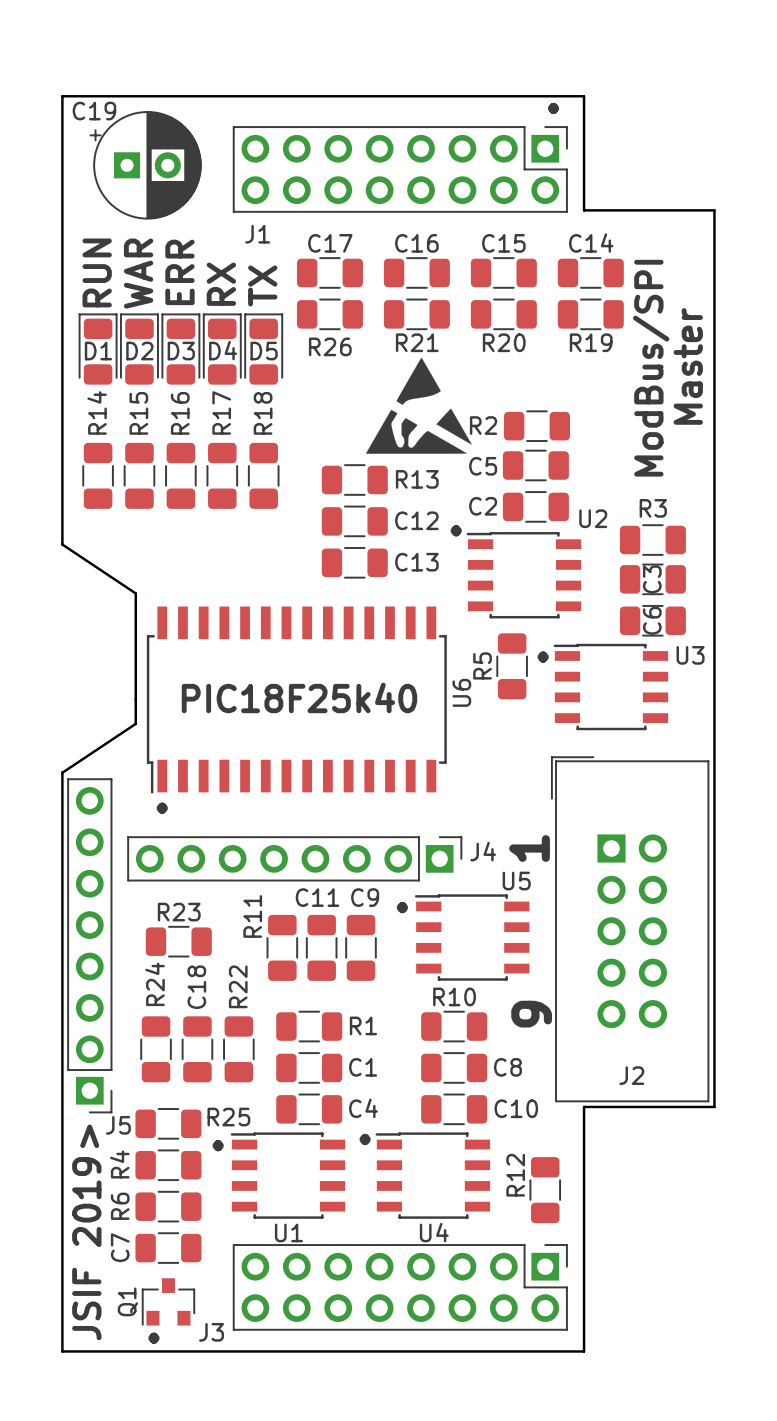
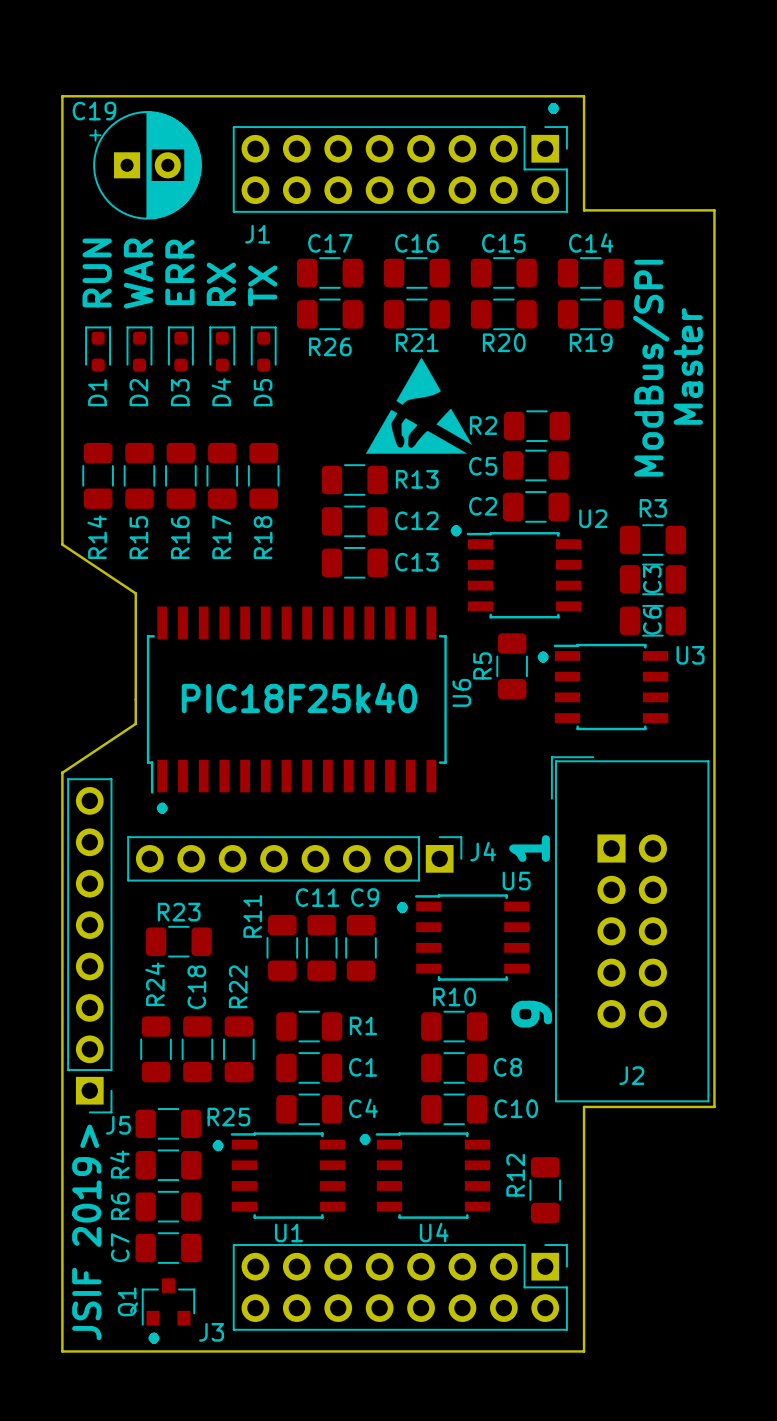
D1 footprint: [78, 313, 118, 385] -> [85, 326, 112, 372]
D2 footprint: [120, 313, 159, 385] -> [126, 326, 153, 372]
D3 footprint: [161, 313, 201, 385] -> [167, 326, 194, 372]
D4 footprint: [202, 313, 242, 385] -> [209, 326, 236, 372]
D5 footprint: [244, 313, 284, 385] -> [250, 326, 277, 372]
D4 name rotation: 0° (223, 350) -> 90° counterclockwise (221, 392)
D4 name position: D4 (223, 350) -> D4 (221, 392)
D1 name rotation: 0° (98, 351) -> 90° counterclockwise (97, 392)
D1 name position: D1 (98, 351) -> D1 (97, 392)
D2 name rotation: 0° (139, 351) -> 90° counterclockwise (138, 392)
D2 name position: D2 (139, 351) -> D2 (138, 392)
D3 name rotation: 0° (181, 351) -> 90° counterclockwise (180, 392)
D3 name position: D3 (181, 351) -> D3 (180, 392)
D5 name rotation: 0° (264, 351) -> 90° counterclockwise (263, 392)
D5 name position: D5 (264, 351) -> D5 (263, 392)
R14 name position: R14 (97, 412) -> R14 (97, 537)
R17 name position: R17 (221, 412) -> R17 (221, 537)
R15 name position: R15 (138, 413) -> R15 (138, 537)
R16 name position: R16 (180, 413) -> R16 (180, 537)
R18 name position: R18 (263, 413) -> R18 (263, 537)

